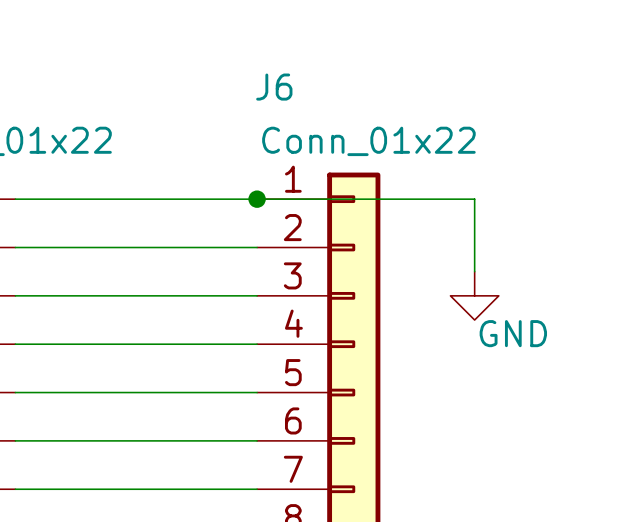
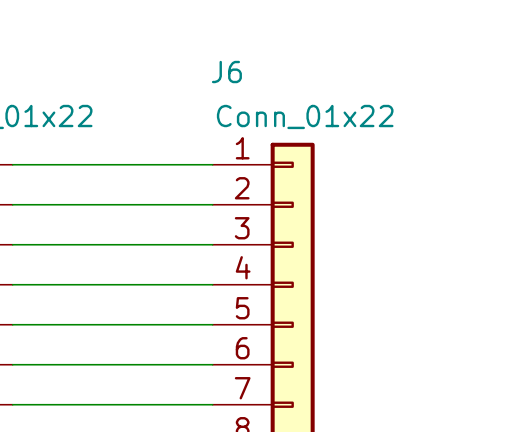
wire: (257, 199) (474, 199) (474, 271) -> none
junction: (257, 199) -> none
power symbol: GND (474, 295) -> none

